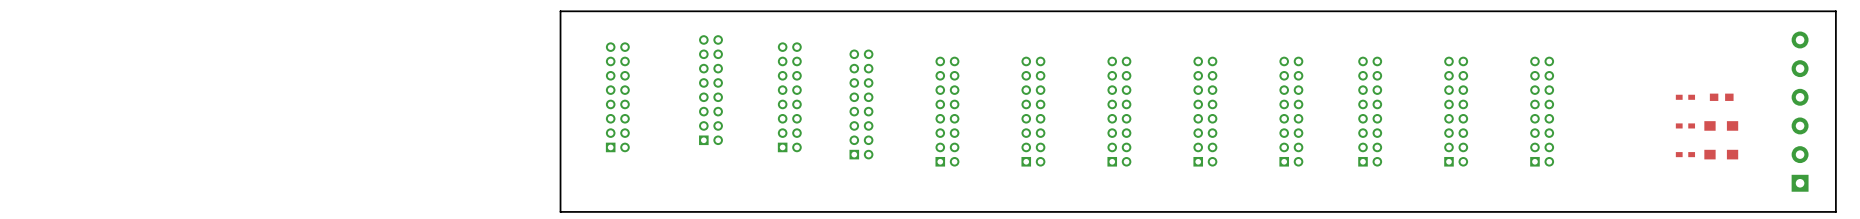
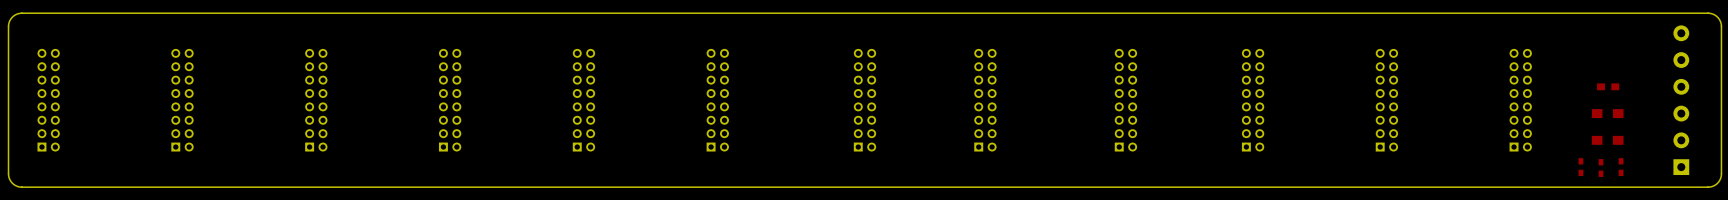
board edge: (1835, 11) (560, 11) (560, 211) (1835, 211) (1835, 11) -> (1708, 13) (1717, 17) (1721, 26) (1721, 175) (1717, 183) (1709, 187) (21, 187) (12, 183) (8, 175) (8, 24) (12, 17) (20, 13) (1708, 13)
part: (710, 90) -> none
part position: (617, 97) -> (583, 100)
part position: (789, 97) -> (717, 100)
part: (1685, 97) -> none
part: (861, 104) -> none
part: none -> (48, 100)
part: none -> (182, 100)
part: none -> (316, 100)
part: none -> (450, 100)
part position: (947, 111) -> (864, 100)
part position: (1033, 111) -> (985, 100)
part: (1119, 111) -> none
part: (1291, 111) -> none
part: none -> (1253, 100)
part: (1370, 111) -> none
part: (1456, 111) -> none
part: none -> (1386, 100)
part: (1542, 111) -> none
part: none -> (1520, 100)
part: (1685, 125) -> none
part: (1685, 154) -> none
part: none -> (1580, 167)
part: none -> (1621, 167)
part: none -> (1601, 168)

